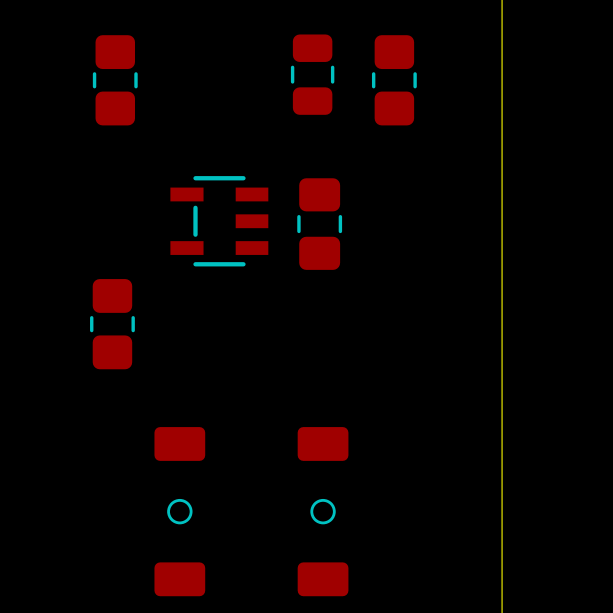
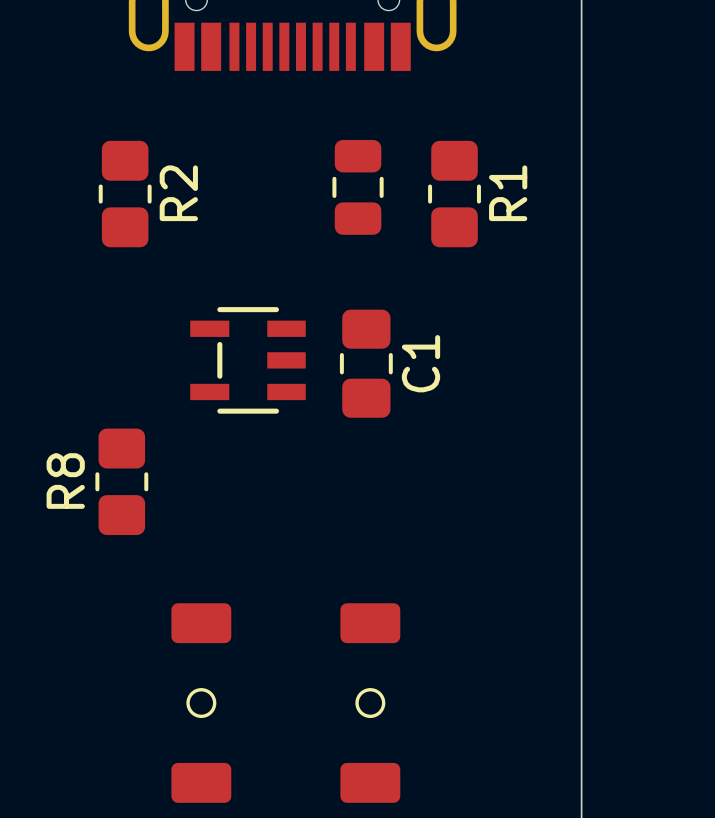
R2 name: none -> R2 (178, 193)
R1 name: none -> R1 (508, 193)
C1 name: none -> C1 (421, 363)
R8 name: none -> R8 (65, 481)

